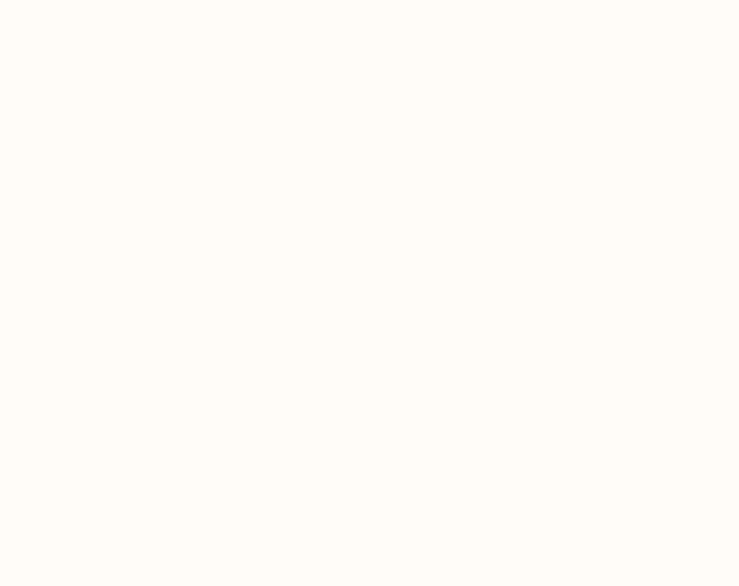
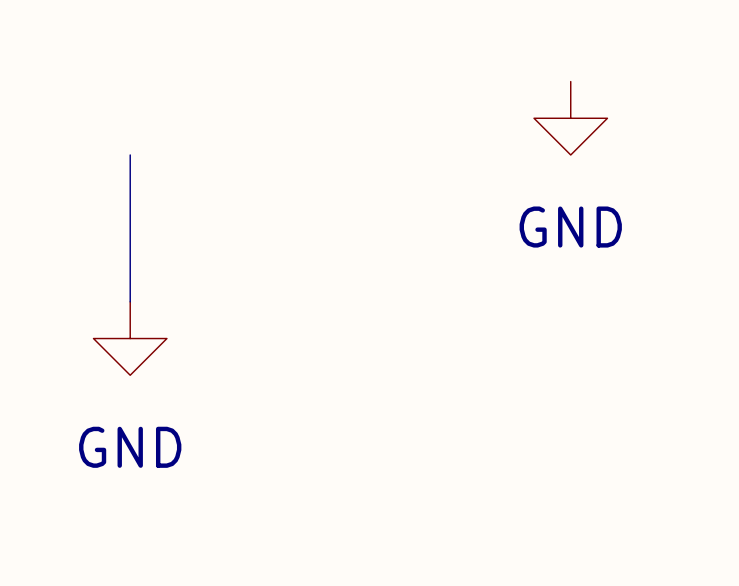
power symbol: none -> GND (570, 118)
wire: none -> (130, 154) (130, 301)
power symbol: none -> GND (130, 338)

